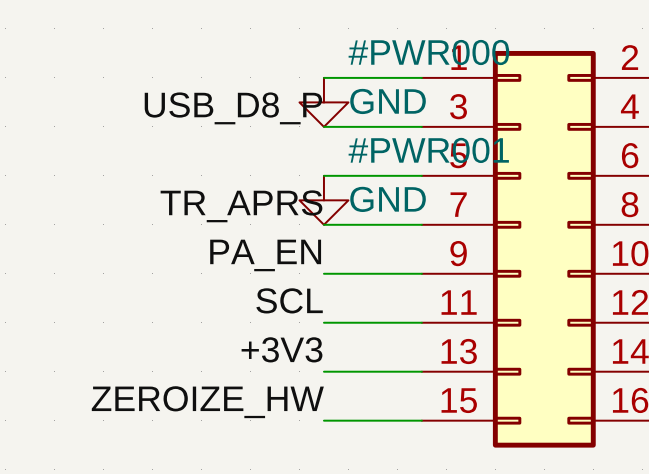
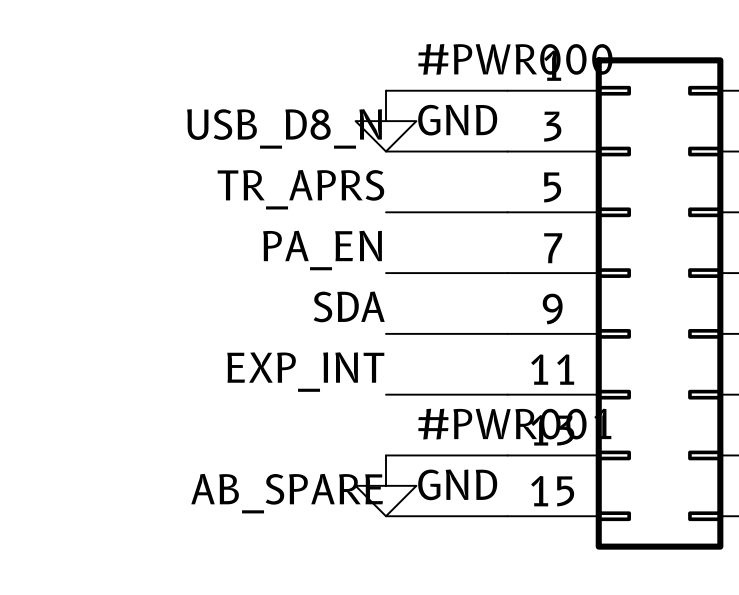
label: USB_D8_P (233, 108) -> USB_D8_N (284, 128)
label: none -> TR_APRS (300, 189)
#PWR001 position: GND (323, 200) -> GND (386, 485)
label: TR_APRS (241, 206) -> PA_EN (322, 250)
label: PA_EN (265, 255) -> SDA (349, 306)
label: SCL (289, 300) -> EXP_INT (305, 372)
label: +3V3 (282, 349) -> none
label: ZEROIZE_HW (207, 402) -> AB_SPARE (287, 493)

